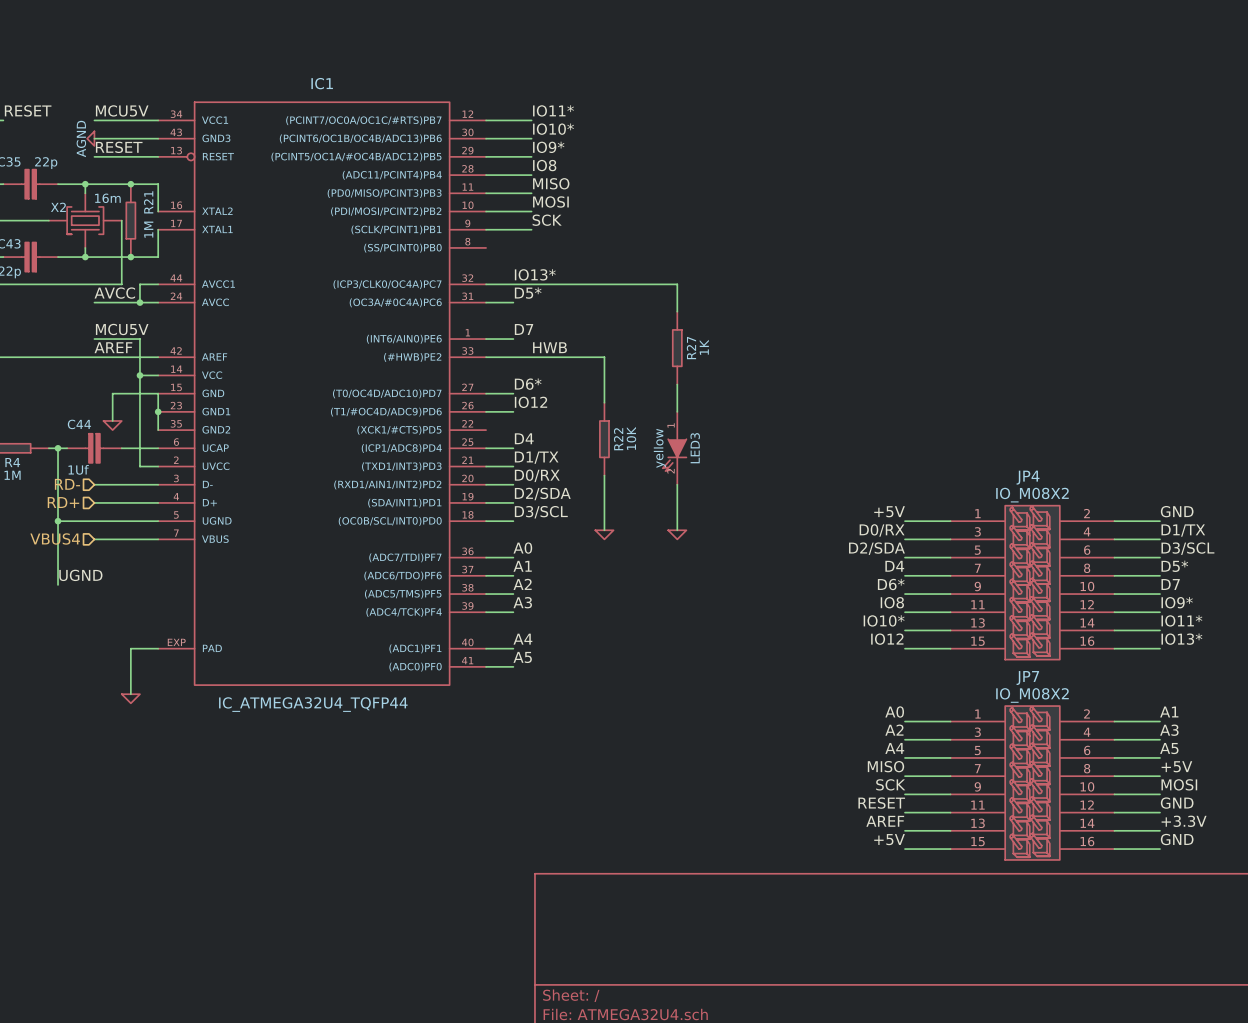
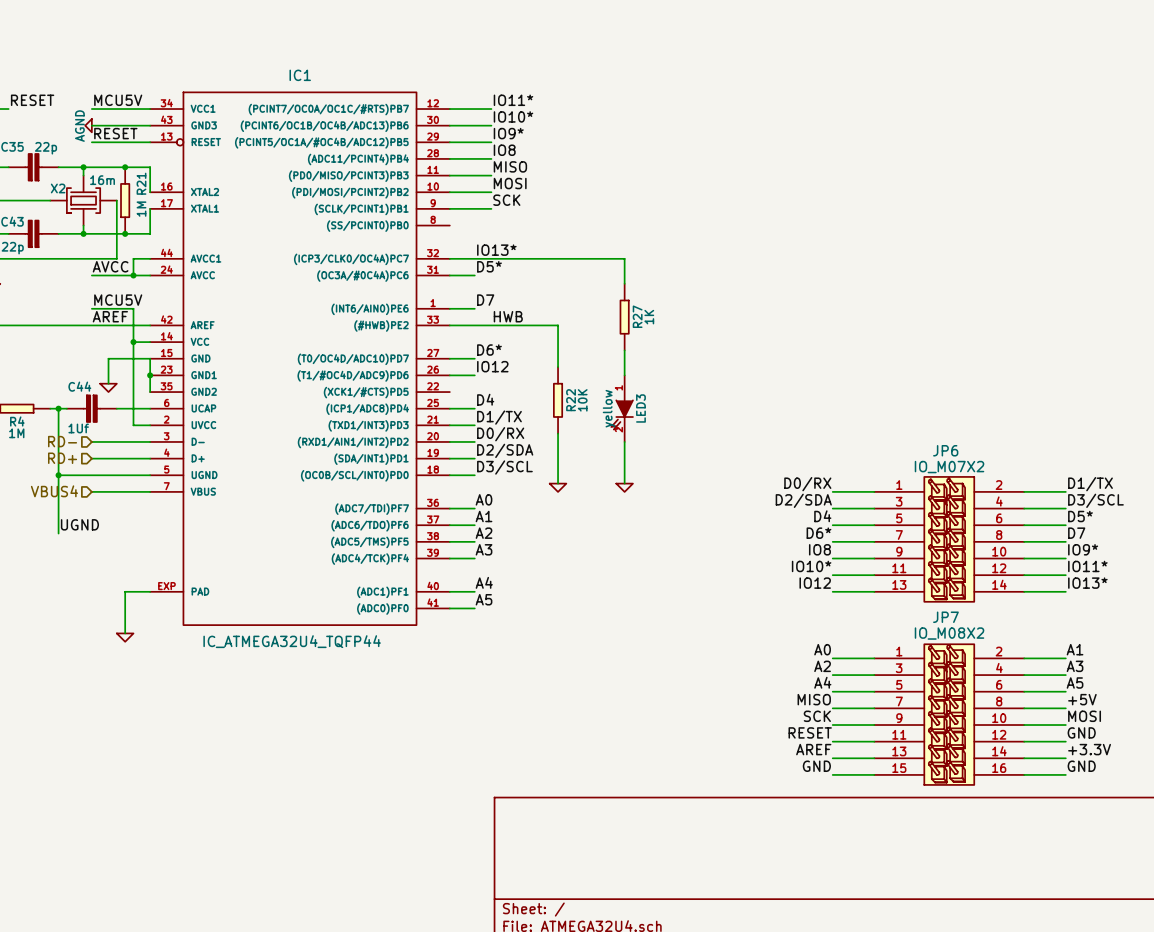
label: +5V (889, 511) -> none
label: GND (1177, 511) -> none
wire: (904, 521) (950, 521) -> none
wire: (1114, 521) (1160, 521) -> none
JP4: IO_M08X2 (1032, 582) -> none
JP6: none -> IO_M07X2 (949, 539)
label: +5V (889, 839) -> GND (816, 766)

